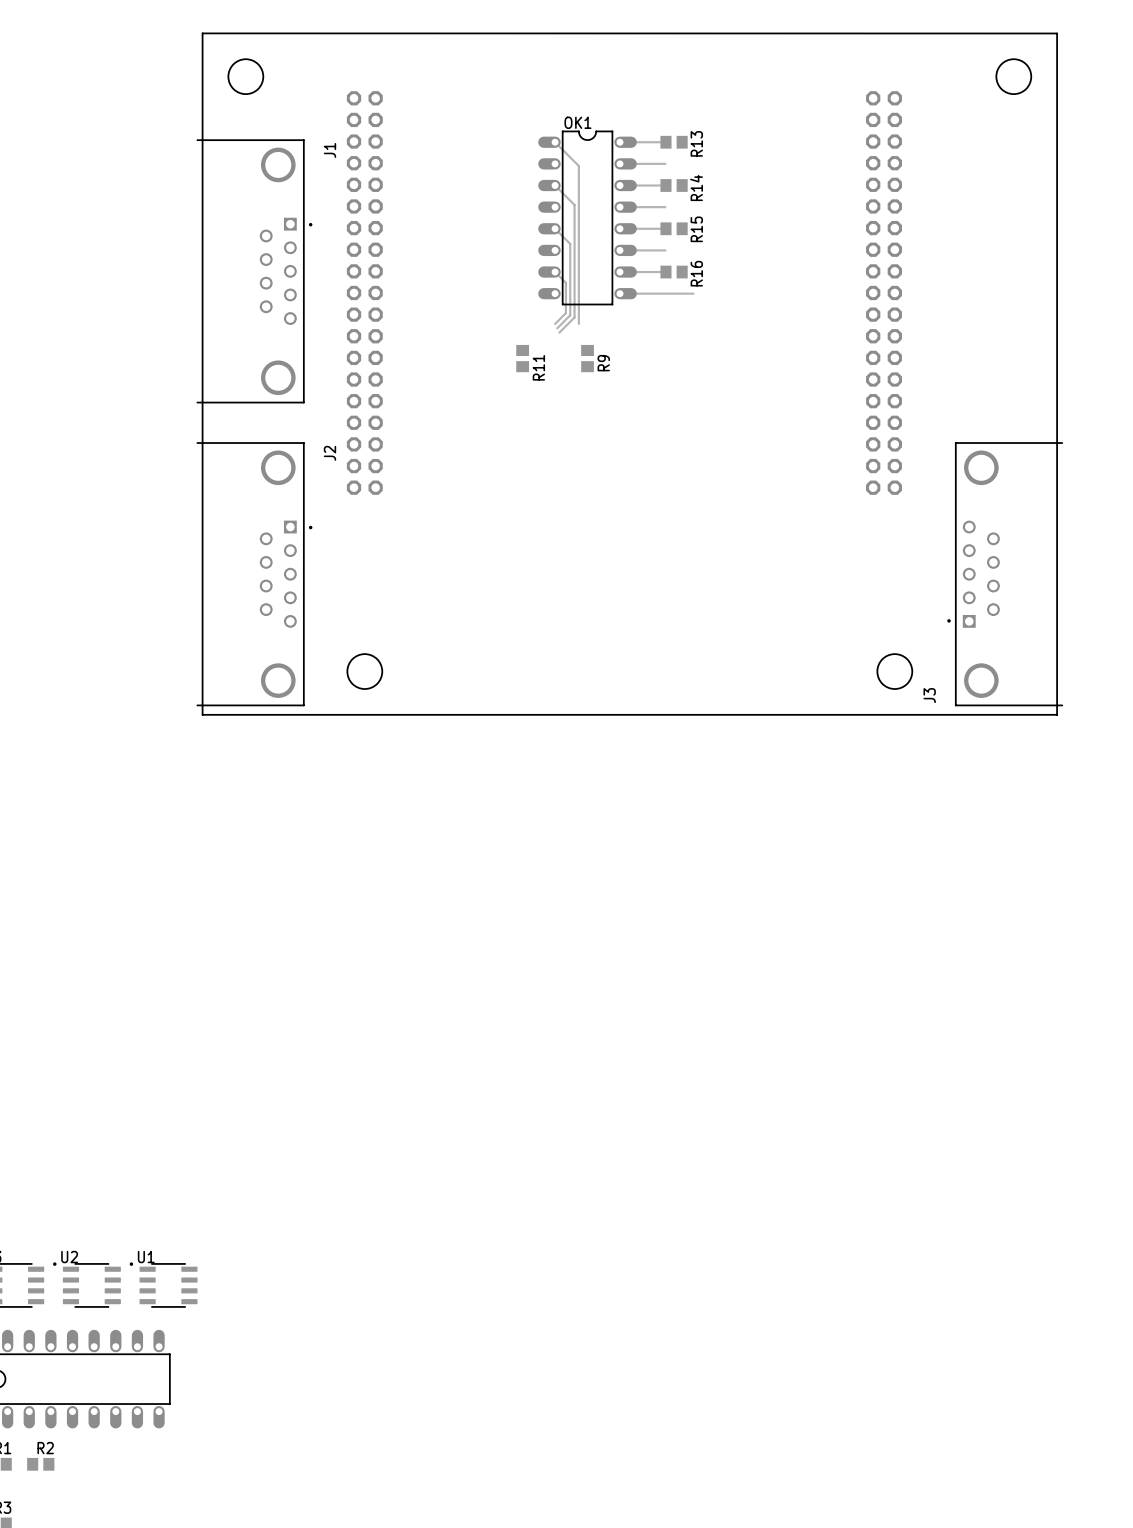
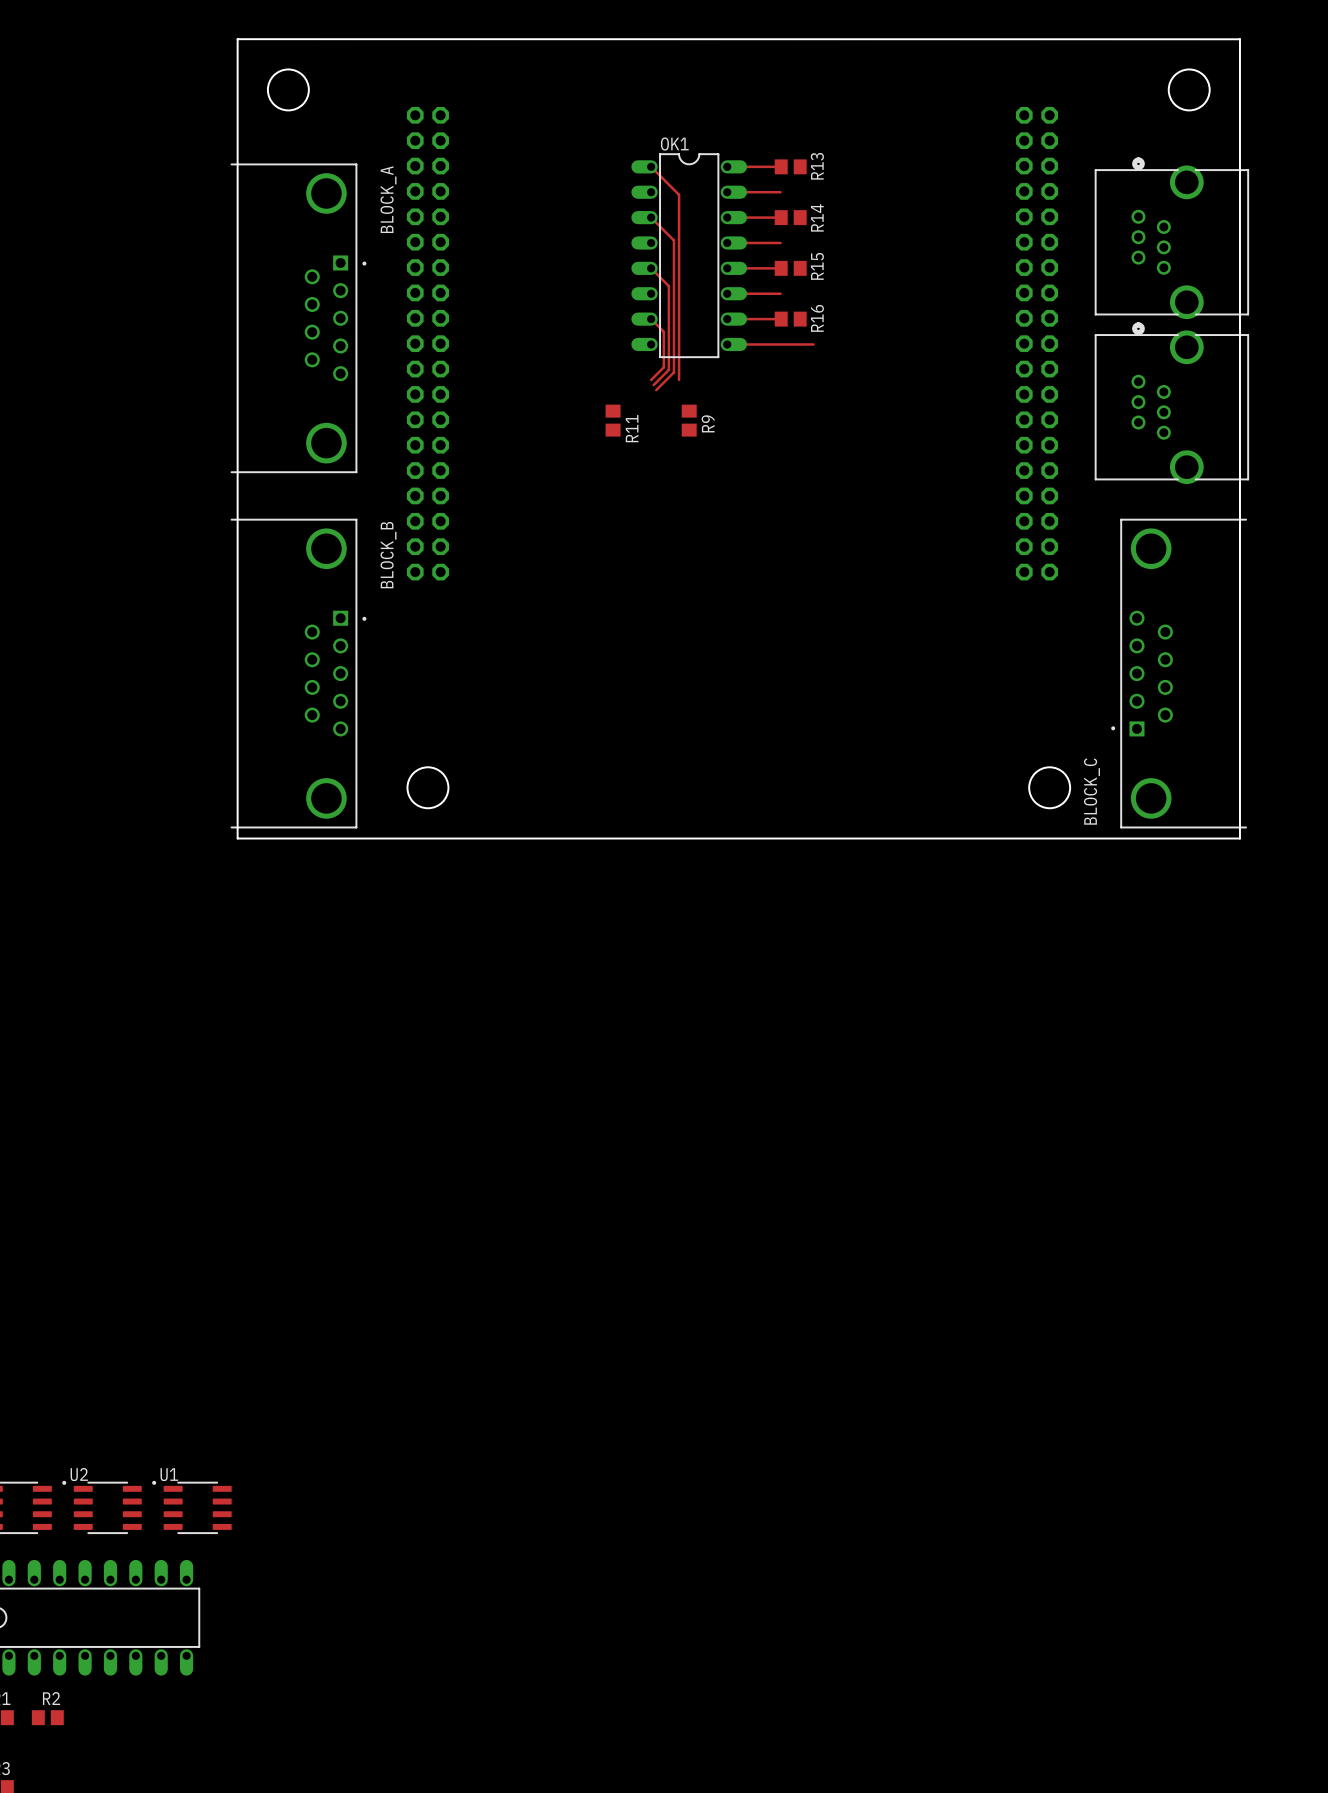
J1 name: J1 (329, 150) -> BLOCK_A (388, 199)
part: none -> (1171, 238)
part: none -> (1171, 403)
J2 name: J2 (329, 453) -> BLOCK_B (388, 555)
J3 name: J3 (929, 695) -> BLOCK_C (1091, 791)

